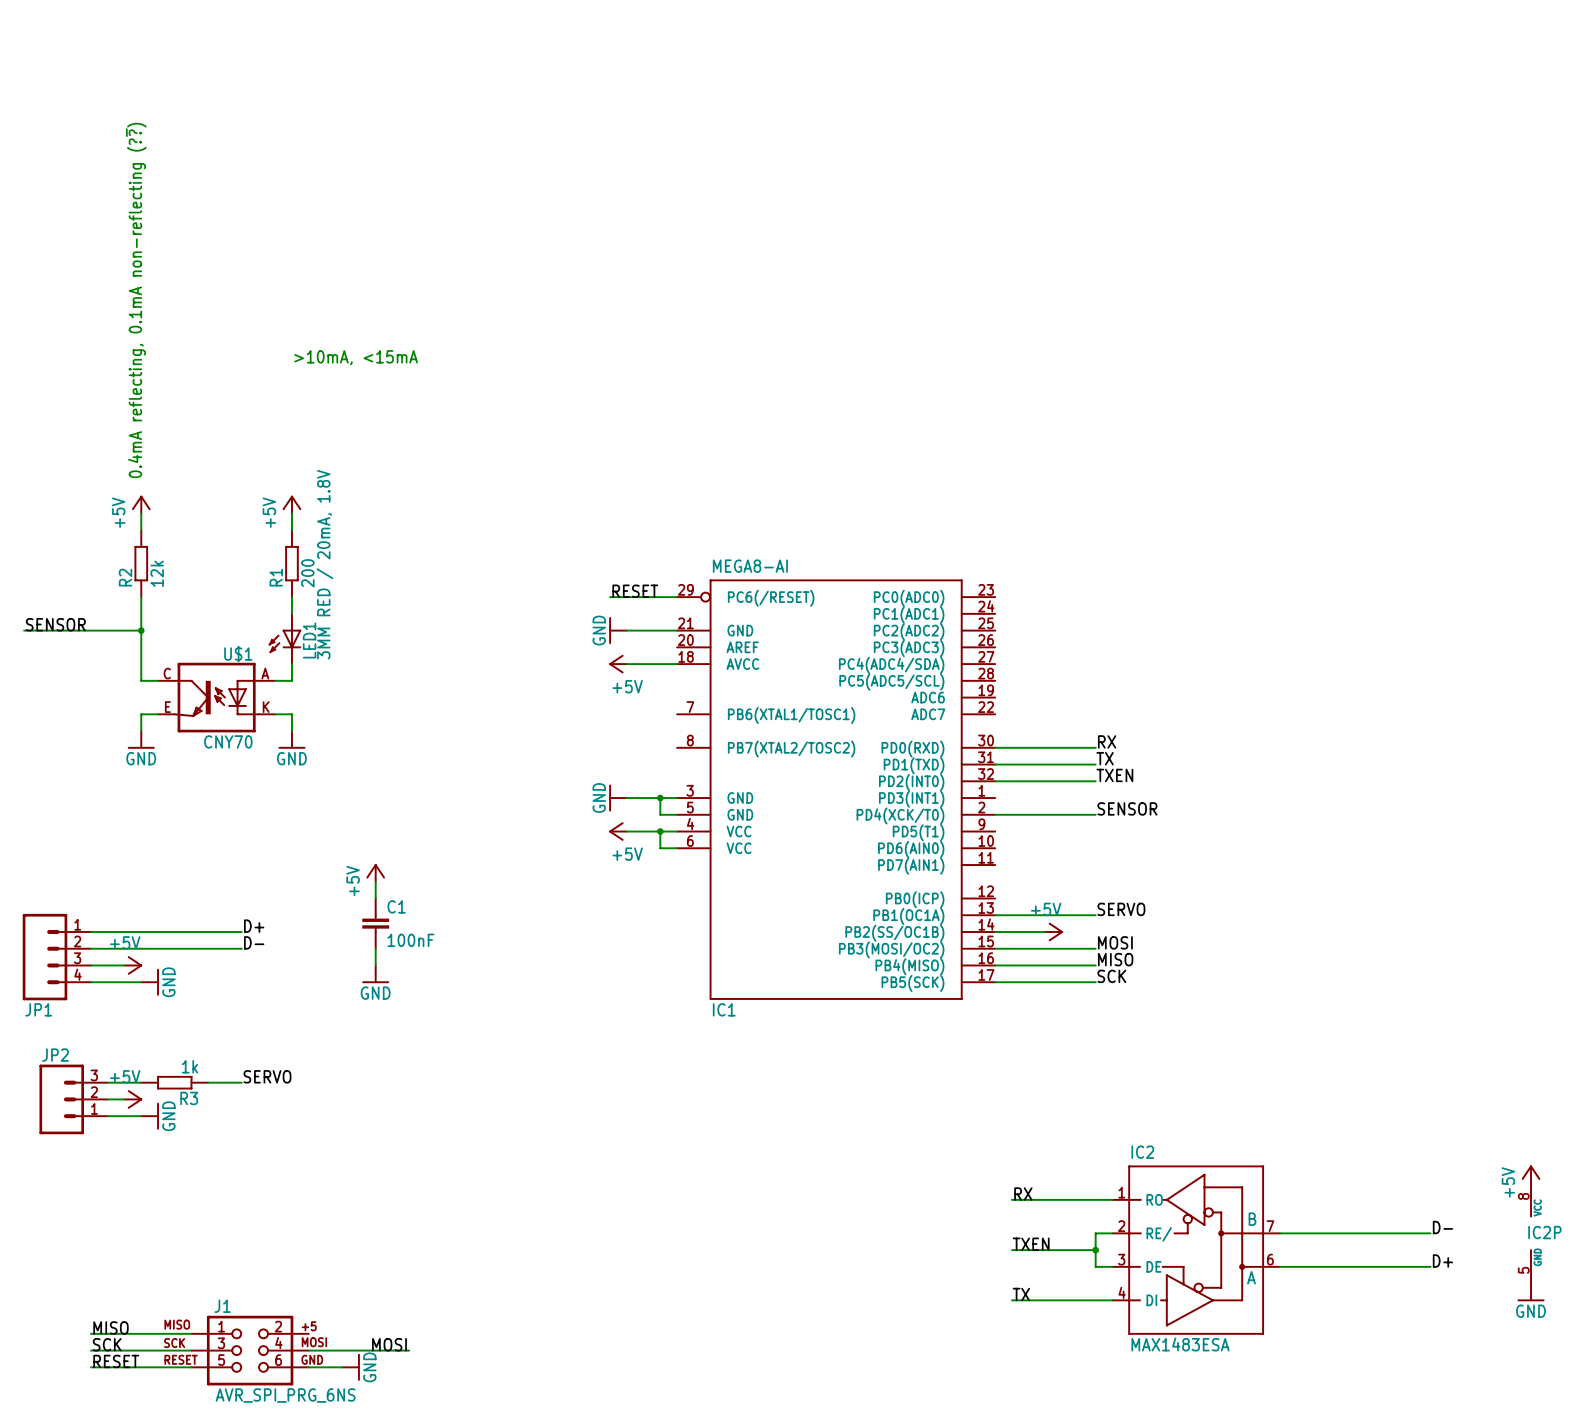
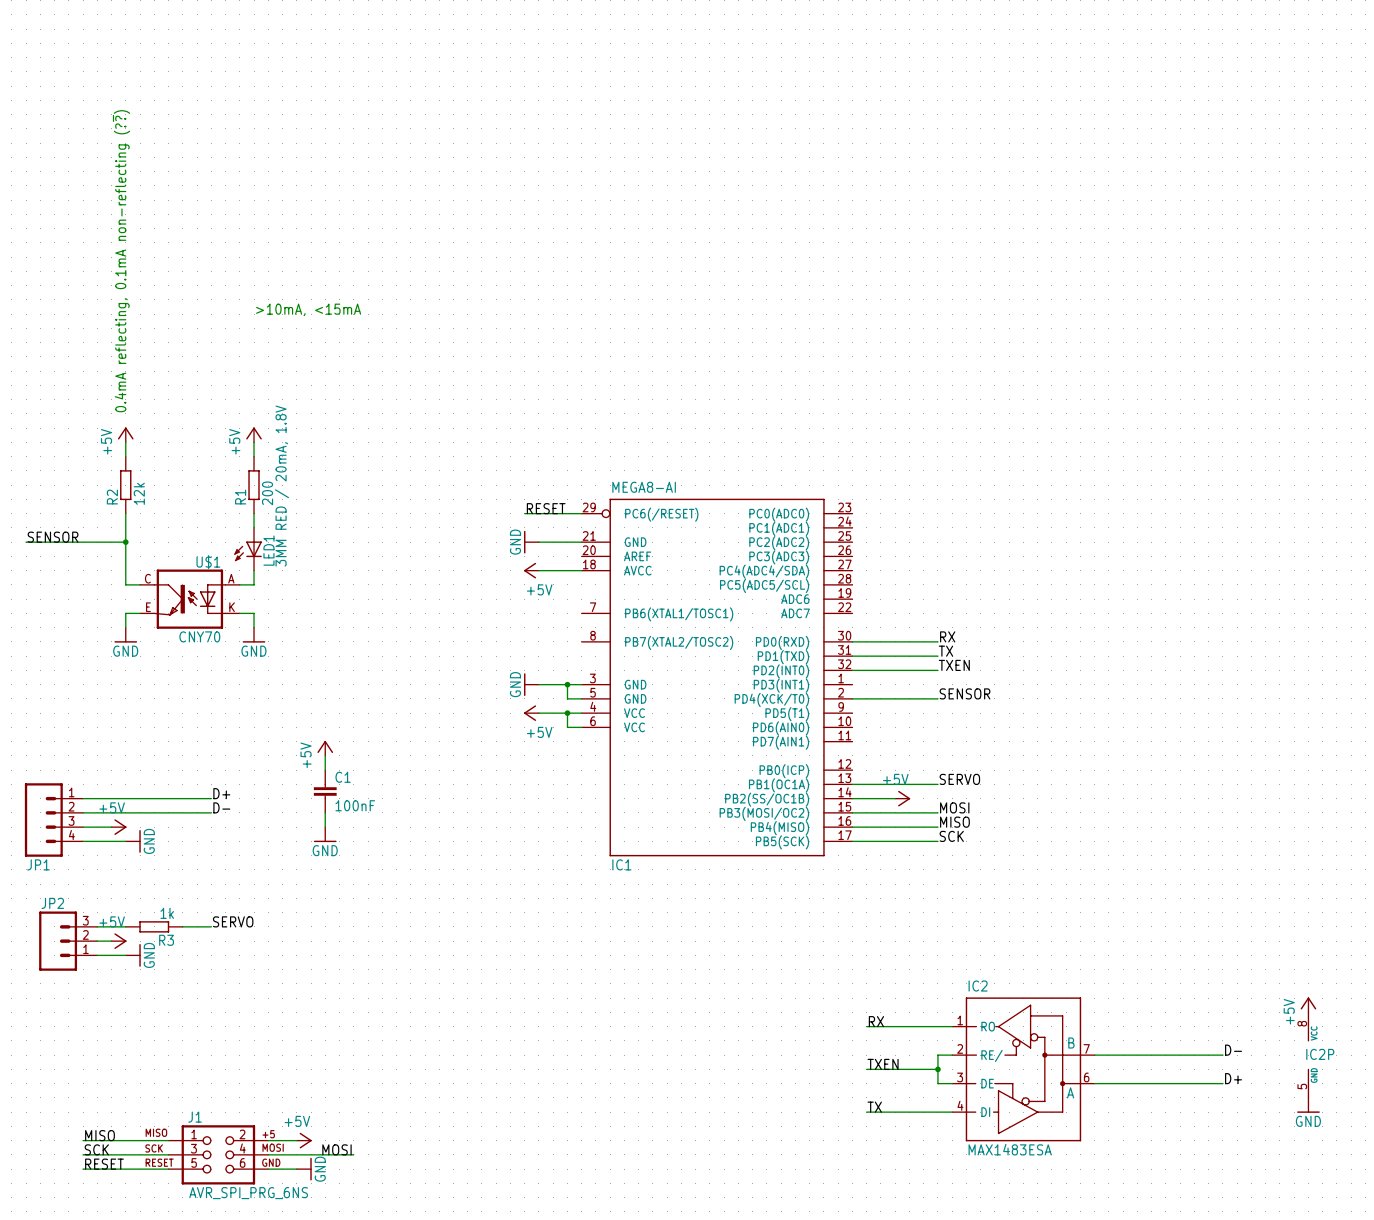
wire: none -> (268, 1140) (296, 1140)
power symbol: none -> +5V (304, 1140)

